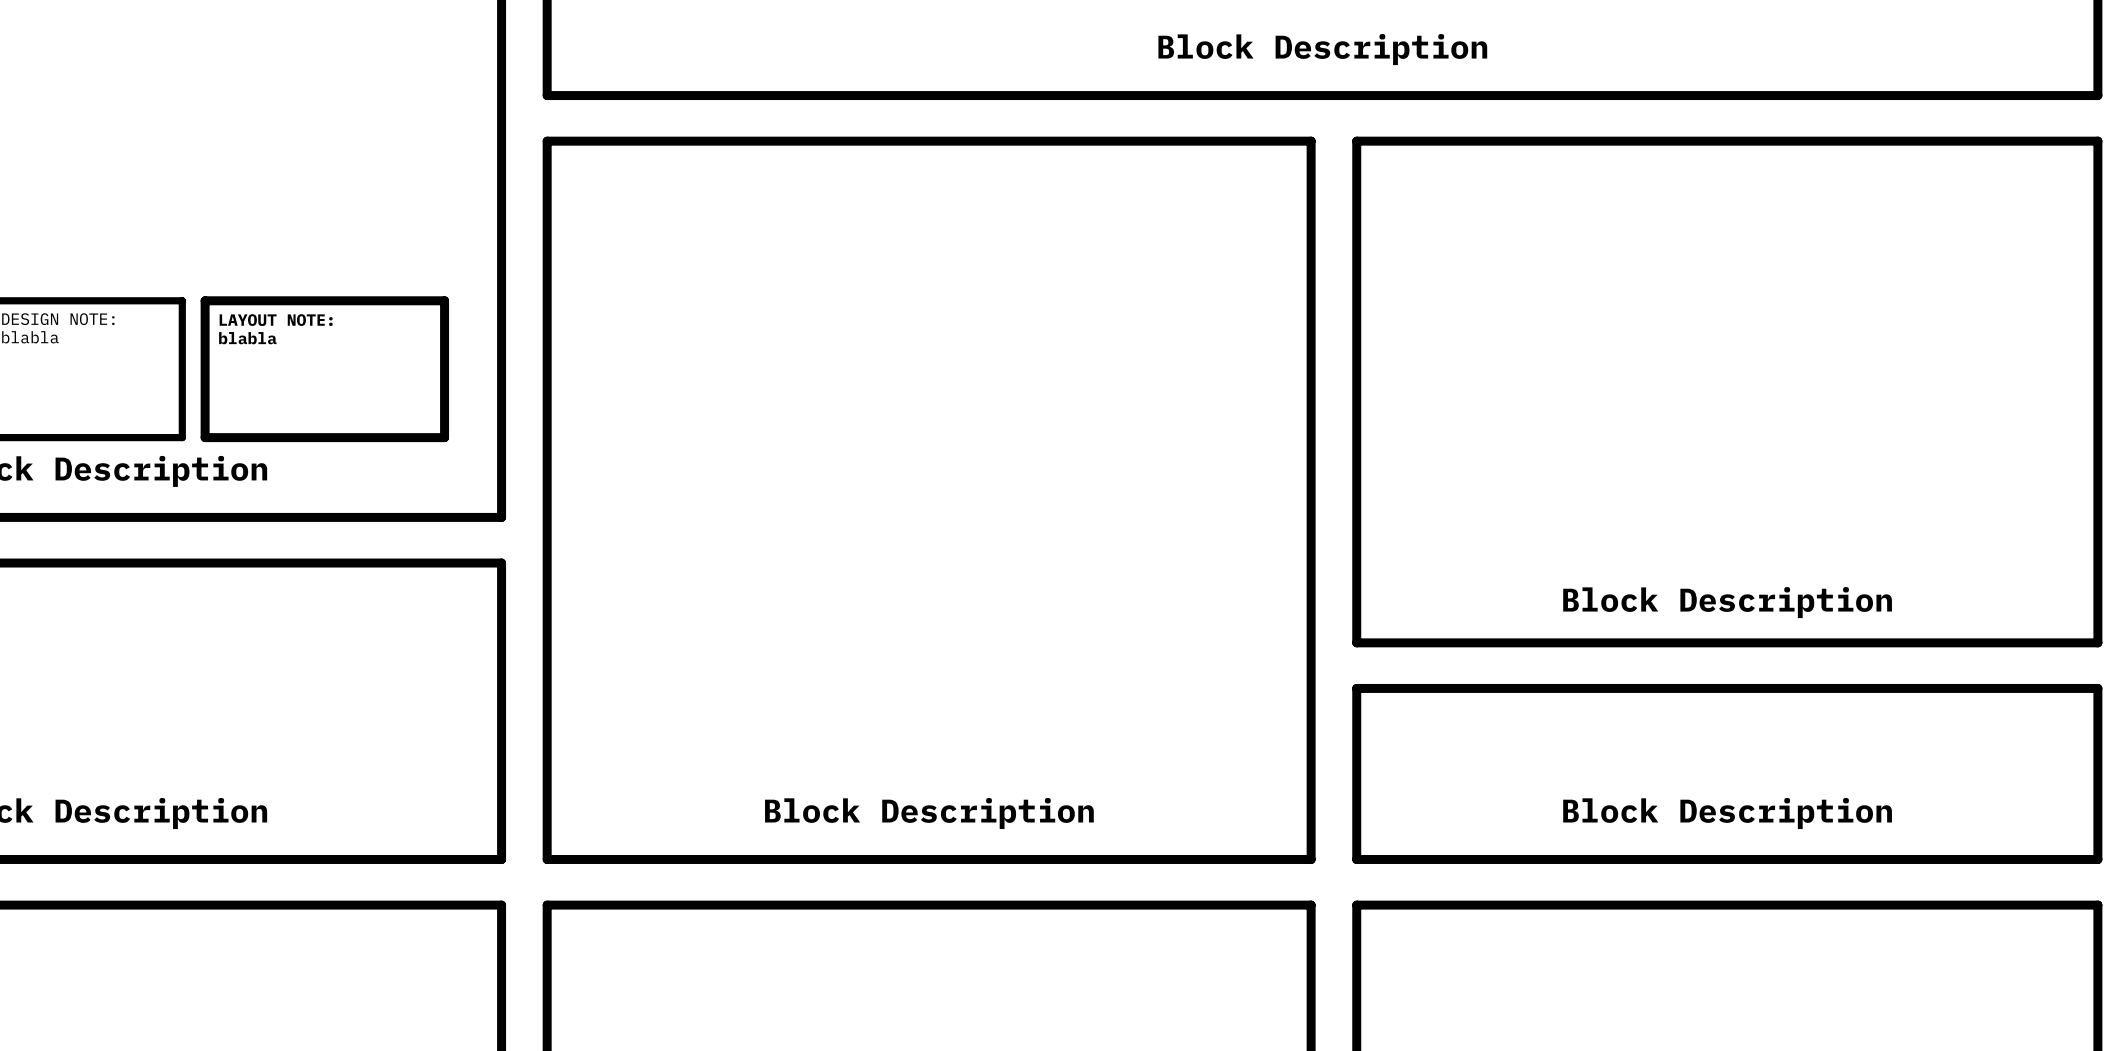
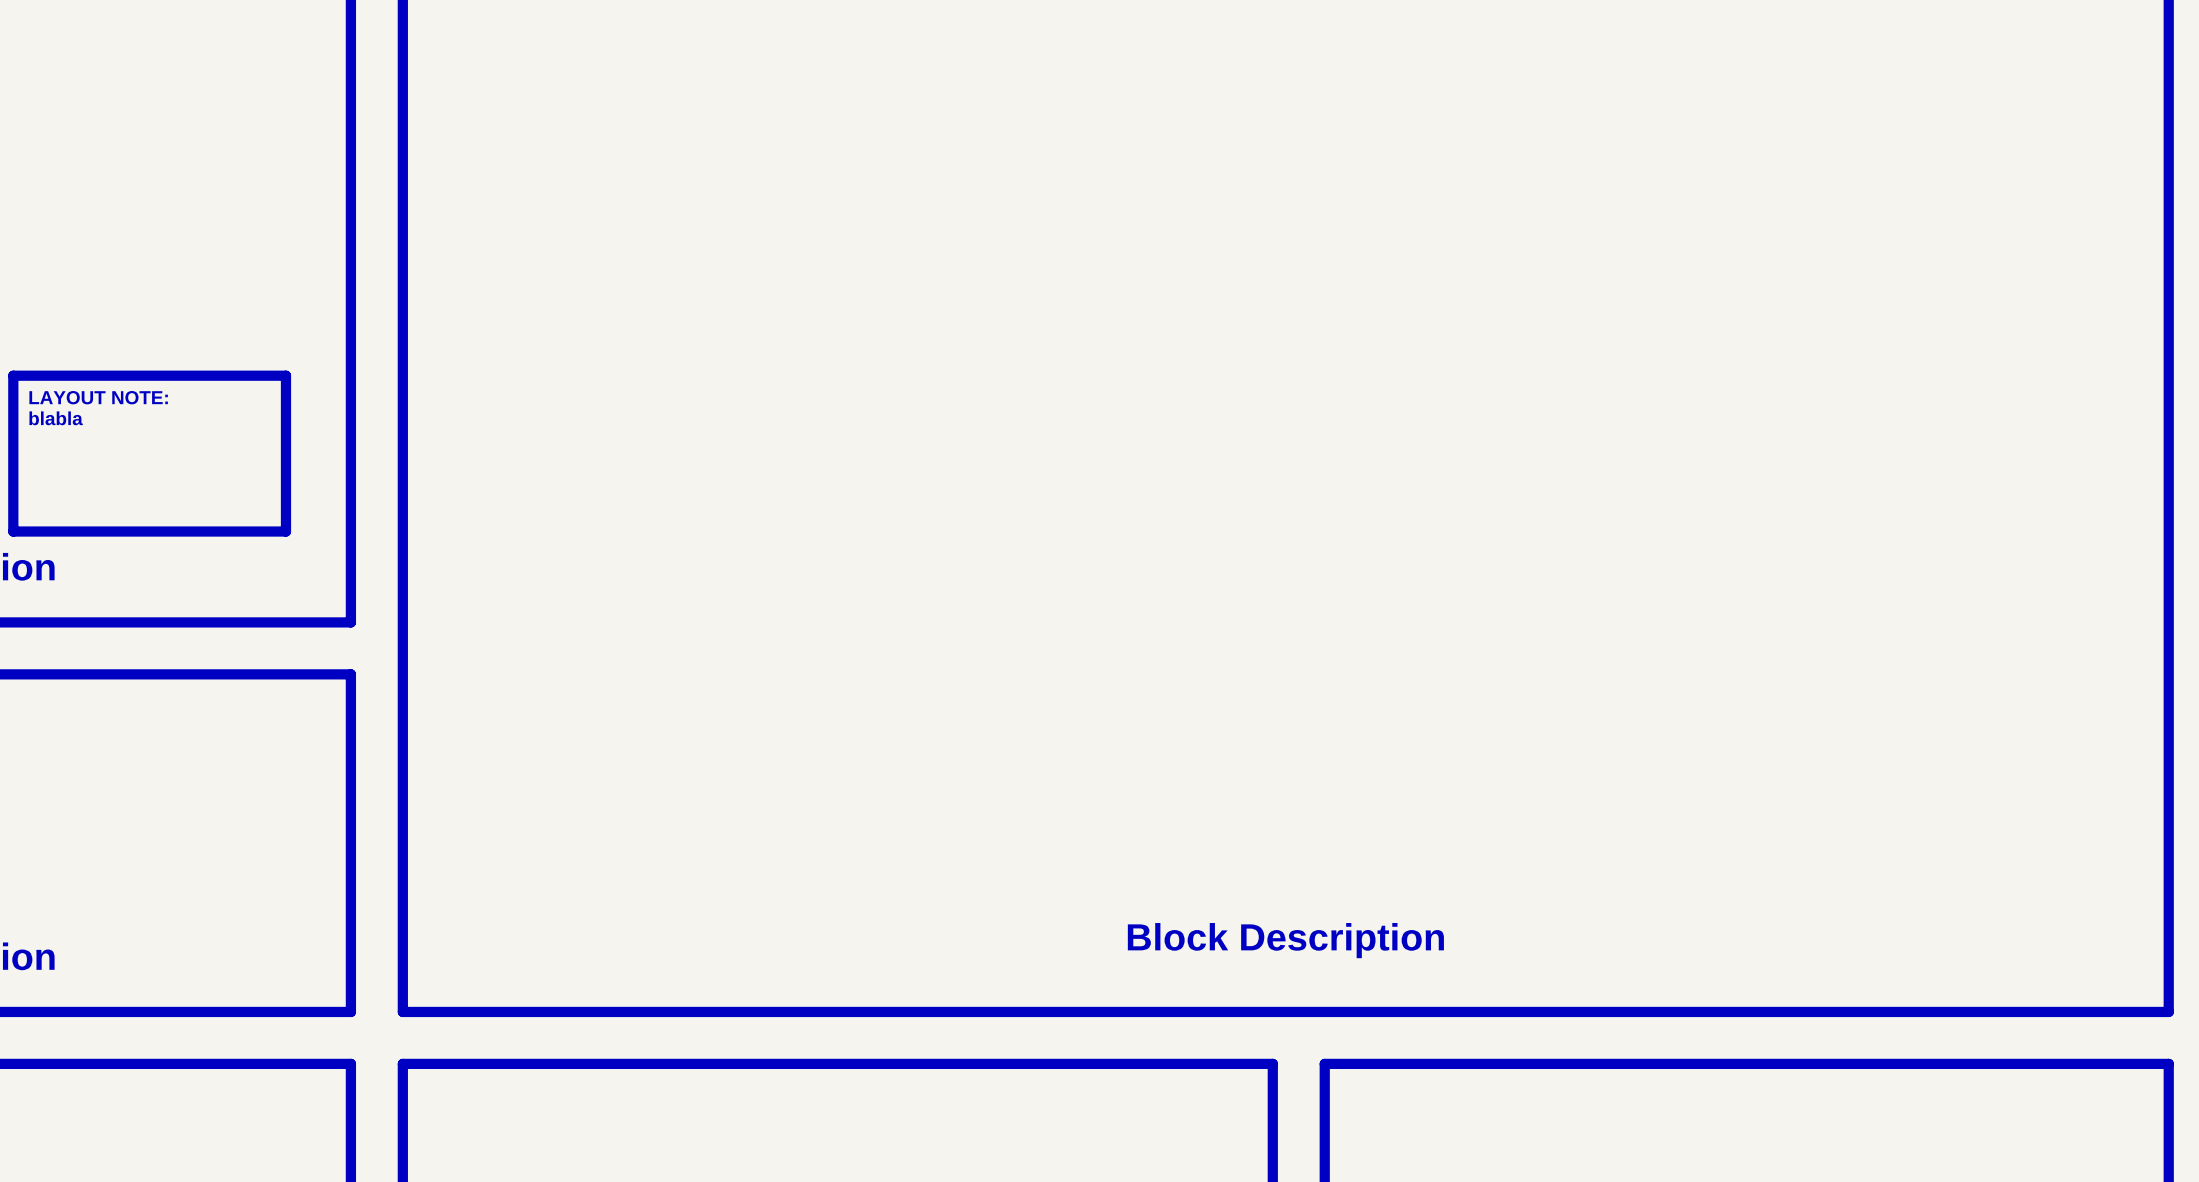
text: Block Description (1322, 49) -> none
line: (547, 95) (2097, 95) -> (2168, 193) (2168, 141)
line: (547, 141) (1311, 141) (1311, 859) -> (402, 193) (402, 141)
line: (2097, 141) (1356, 141) (1356, 642) (2097, 642) -> (2168, 817) (2168, 765)
text: Block Description (1727, 602) -> none
line: (2097, 688) (1356, 688) (1356, 859) -> (1272, 1011) (1324, 1011)
text: none -> Block Description (1285, 940)
text: Block Description (929, 813) -> none
text: Block Description (1727, 813) -> none

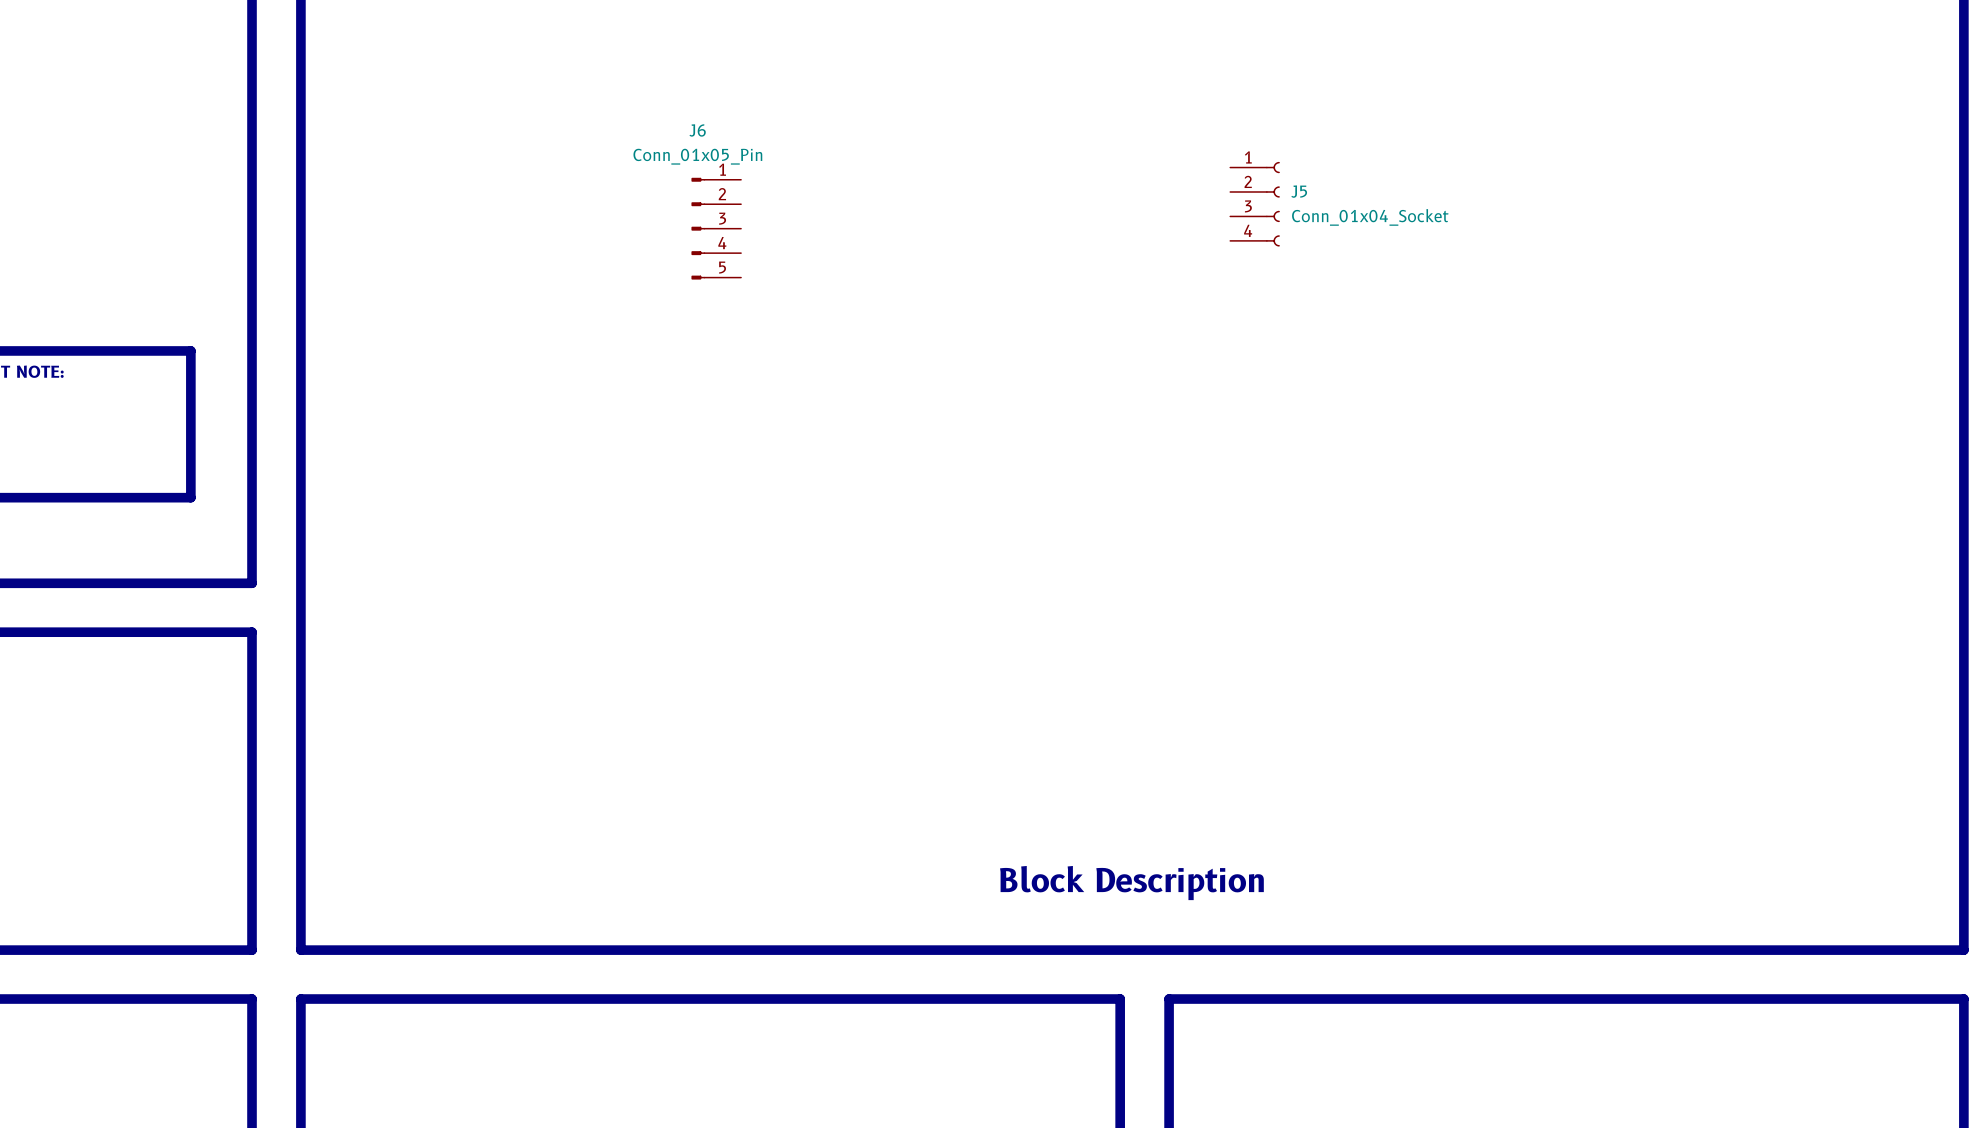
J5: none -> Conn_01x04_Socket (1255, 204)
J6: none -> Conn_01x05_Pin (716, 228)

